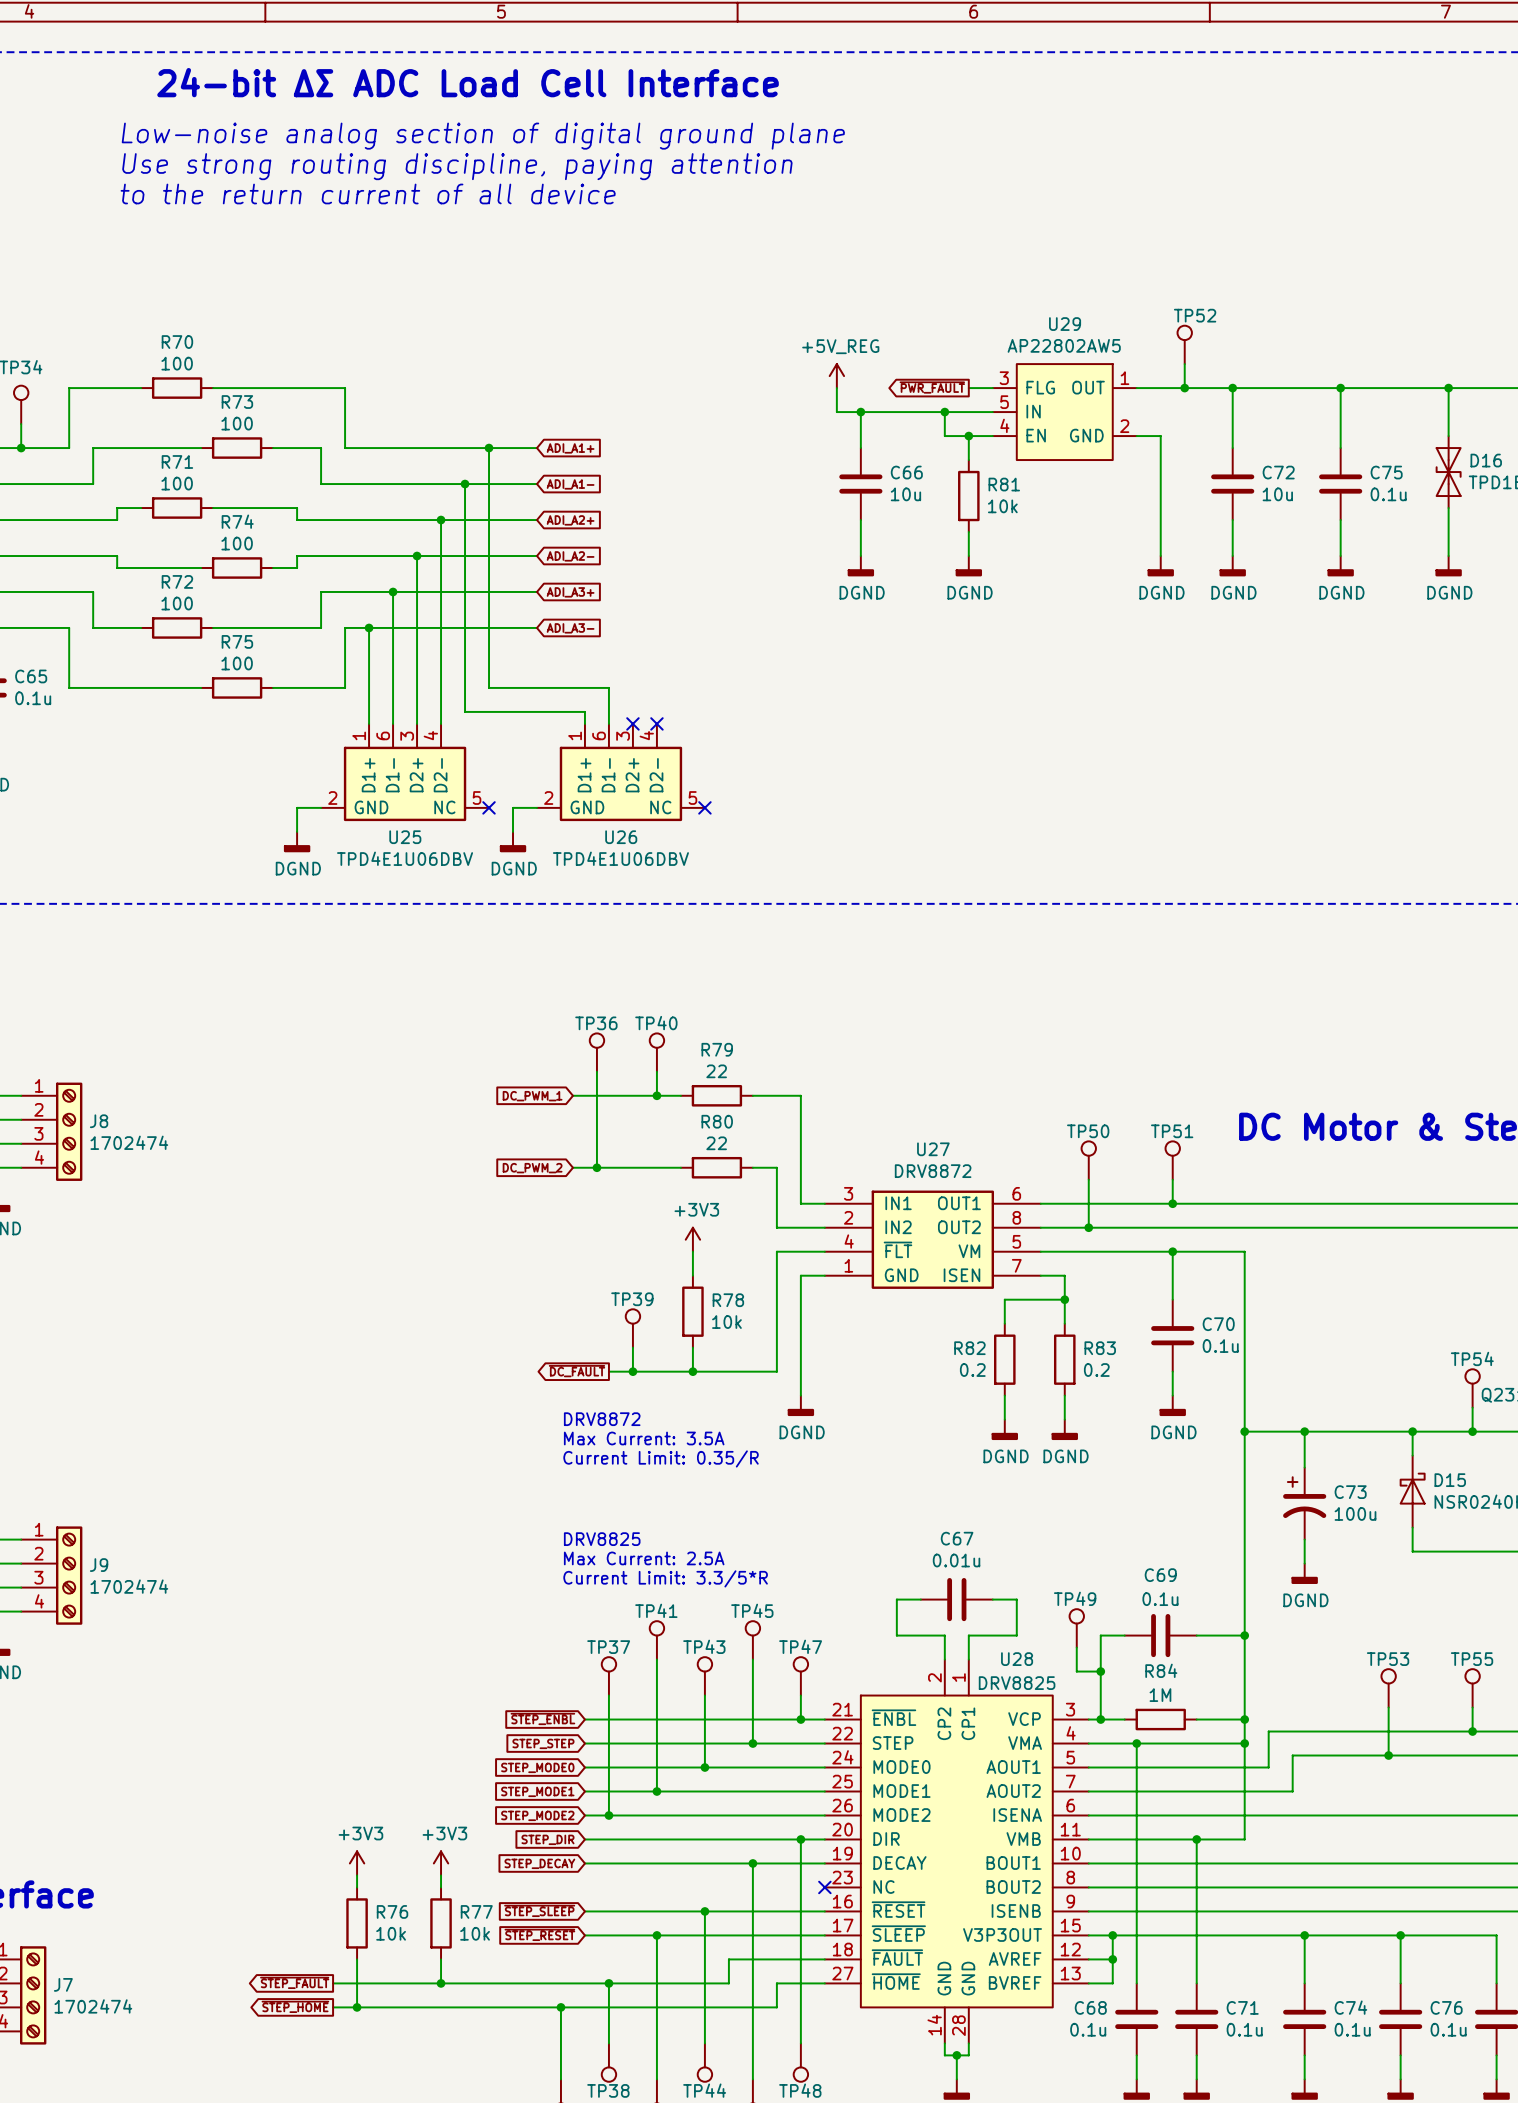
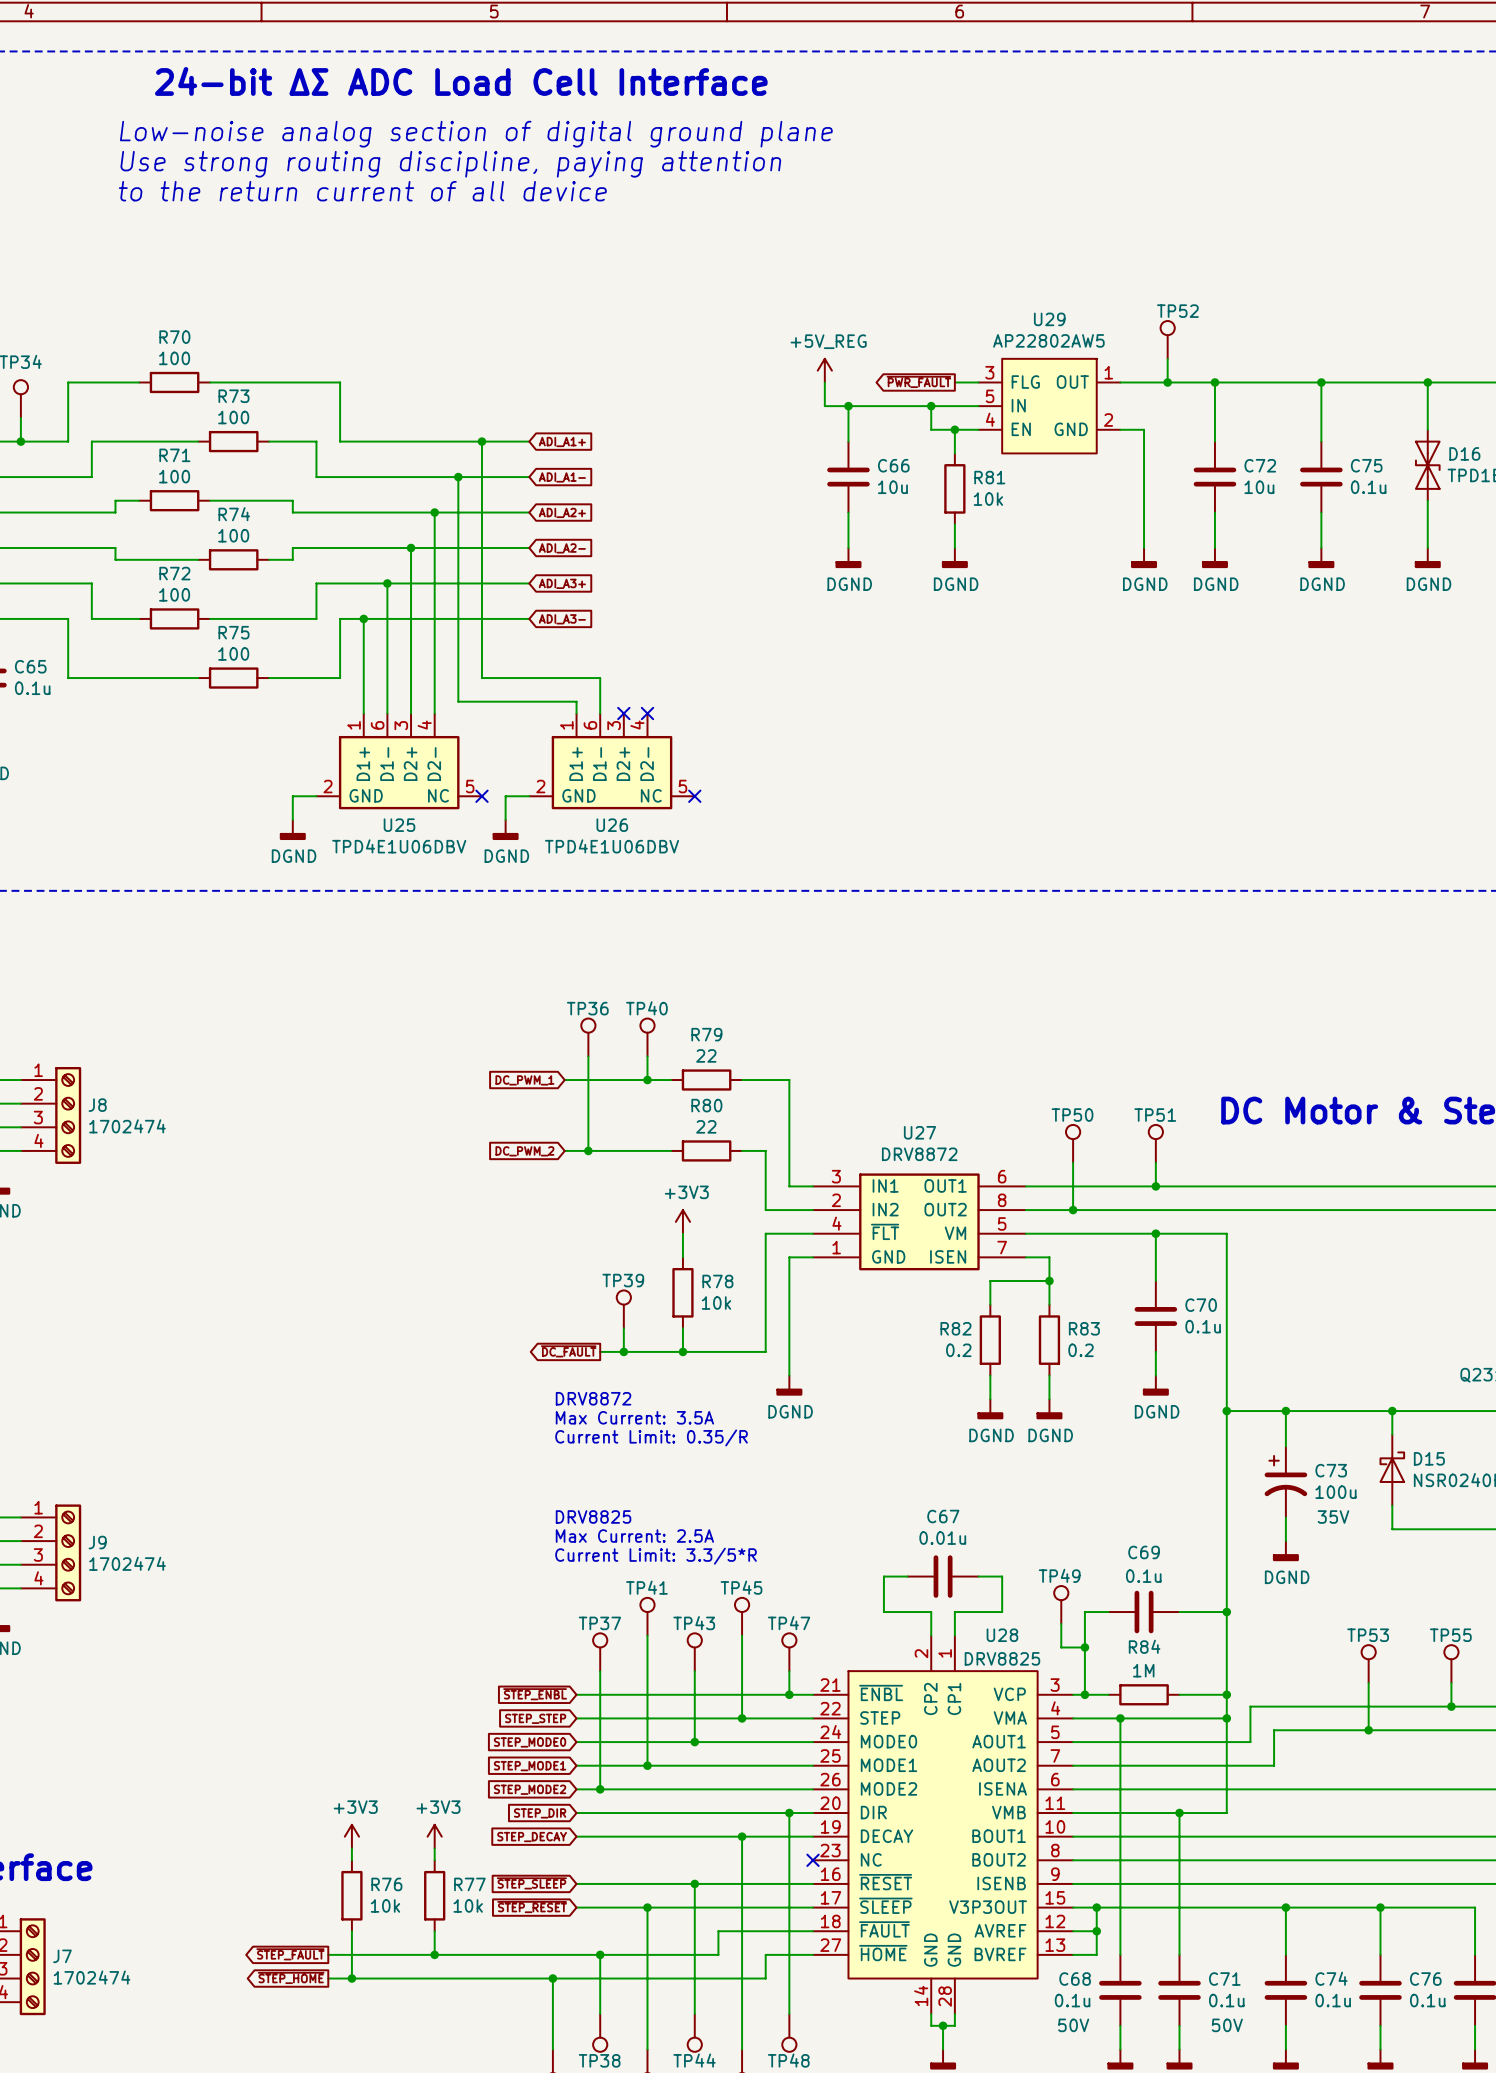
TP54: (1472, 1388) -> none
wire: (1472, 1407) (1472, 1431) -> none
junction: (1472, 1431) -> none
C73 text: none -> 35V (1333, 1517)
C68 text: none -> 50V (1073, 2025)
C71 text: none -> 50V (1227, 2025)

